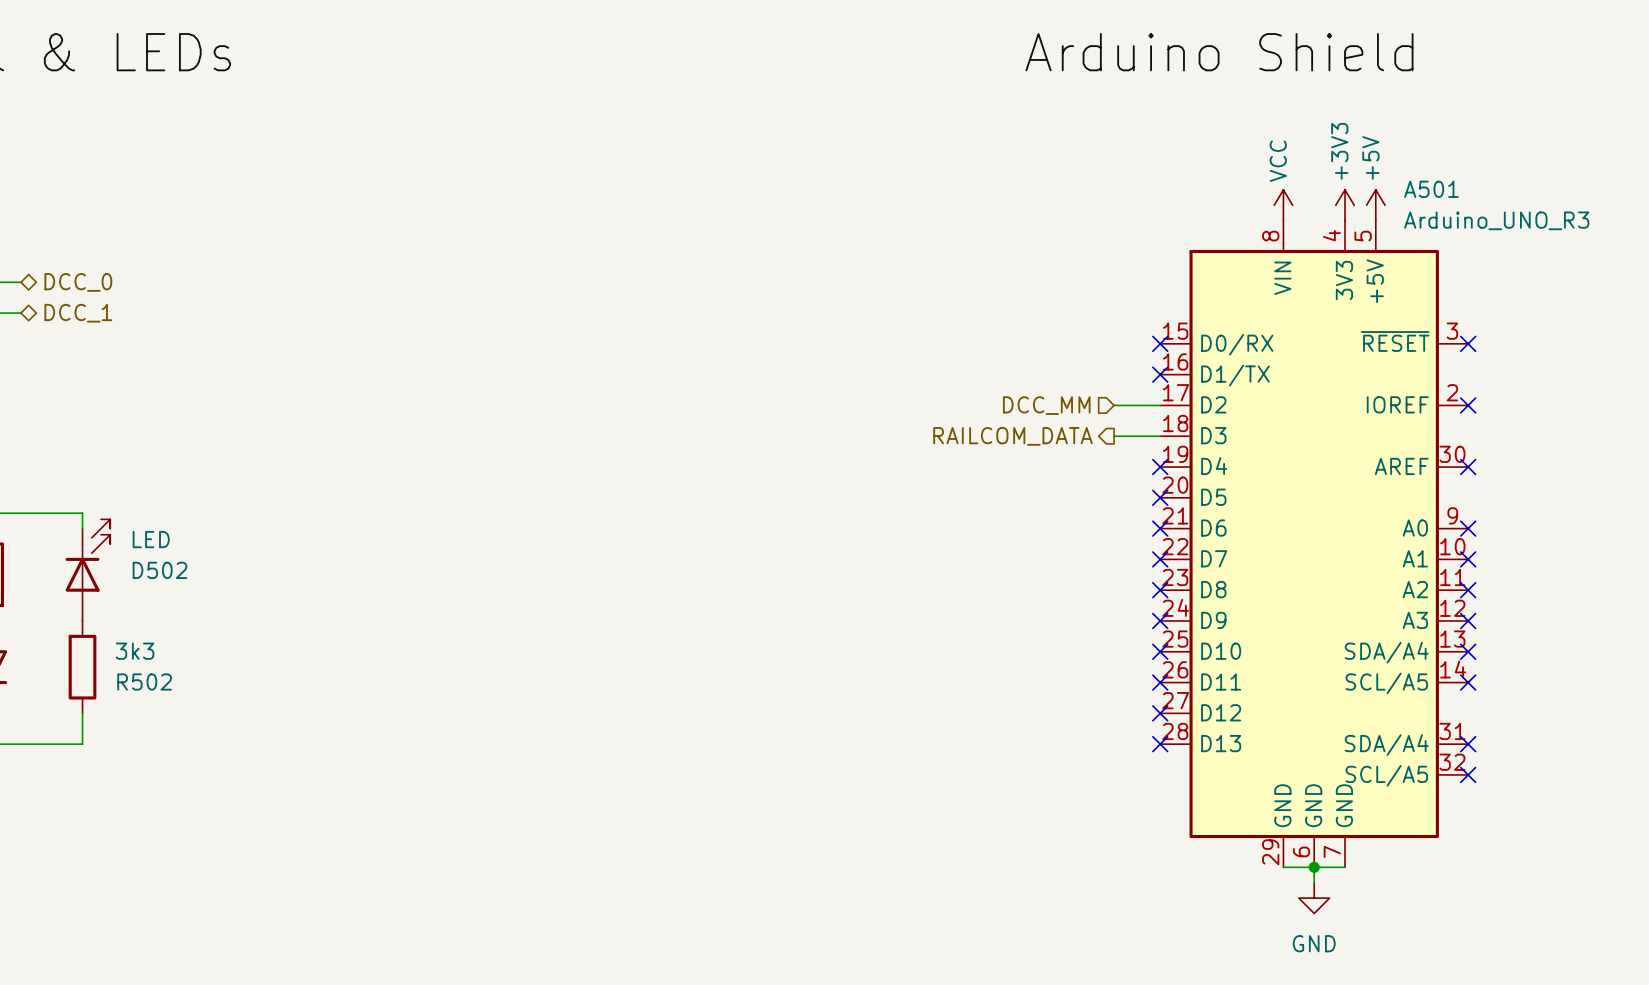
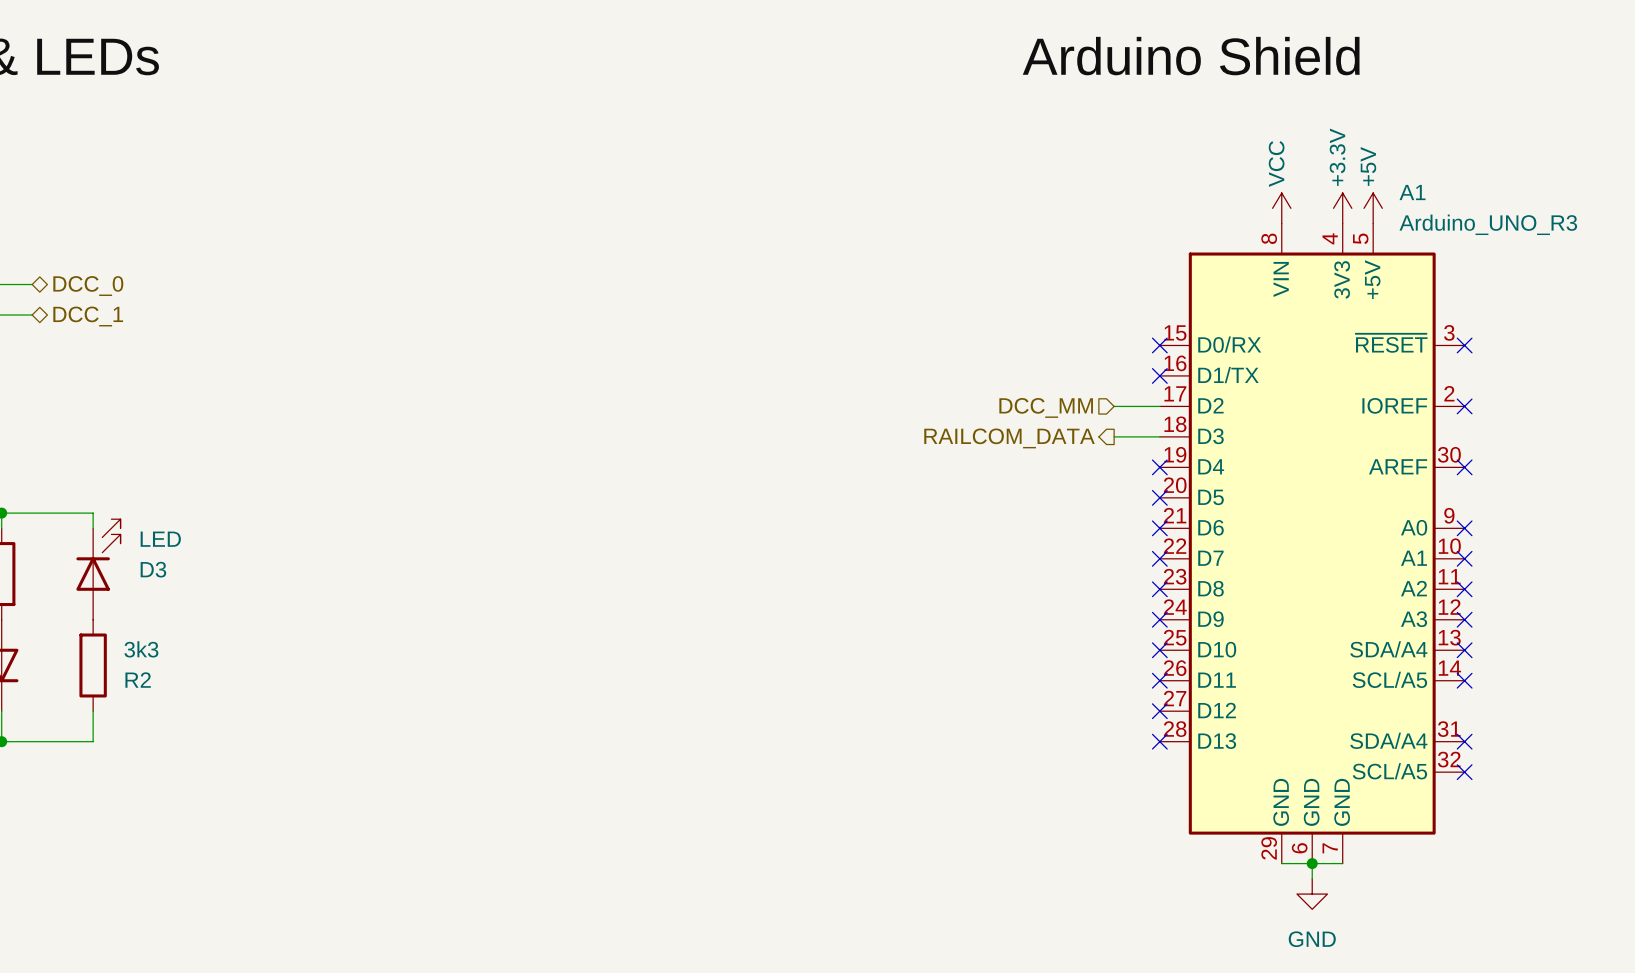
A501 name: A501 (1431, 189) -> A1 (1412, 192)
power symbol: +3V3 (1345, 205) -> +3.3V (1342, 208)
D502 name: D502 (159, 570) -> D3 (153, 569)
R502 name: R502 (144, 681) -> R2 (138, 680)

